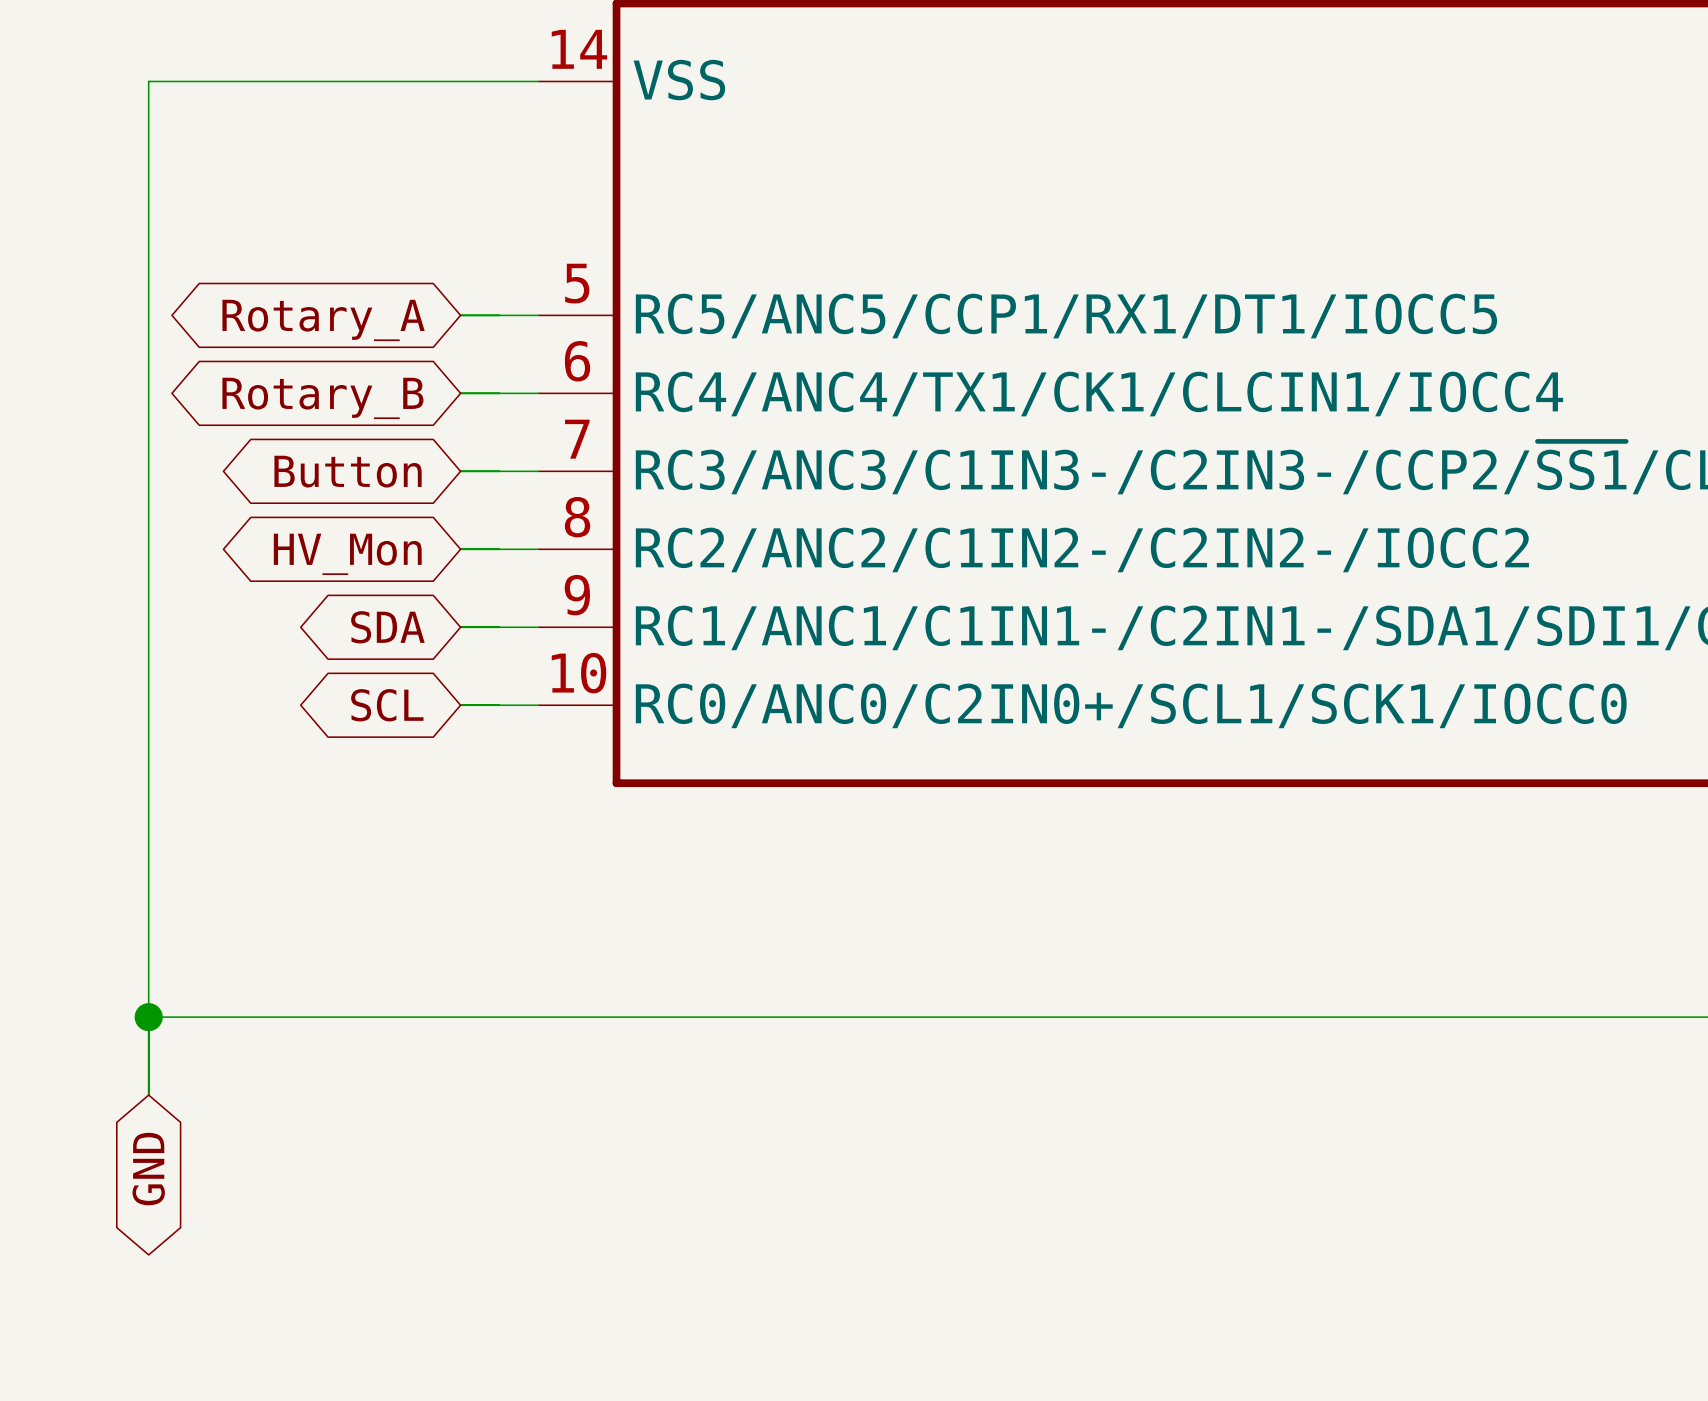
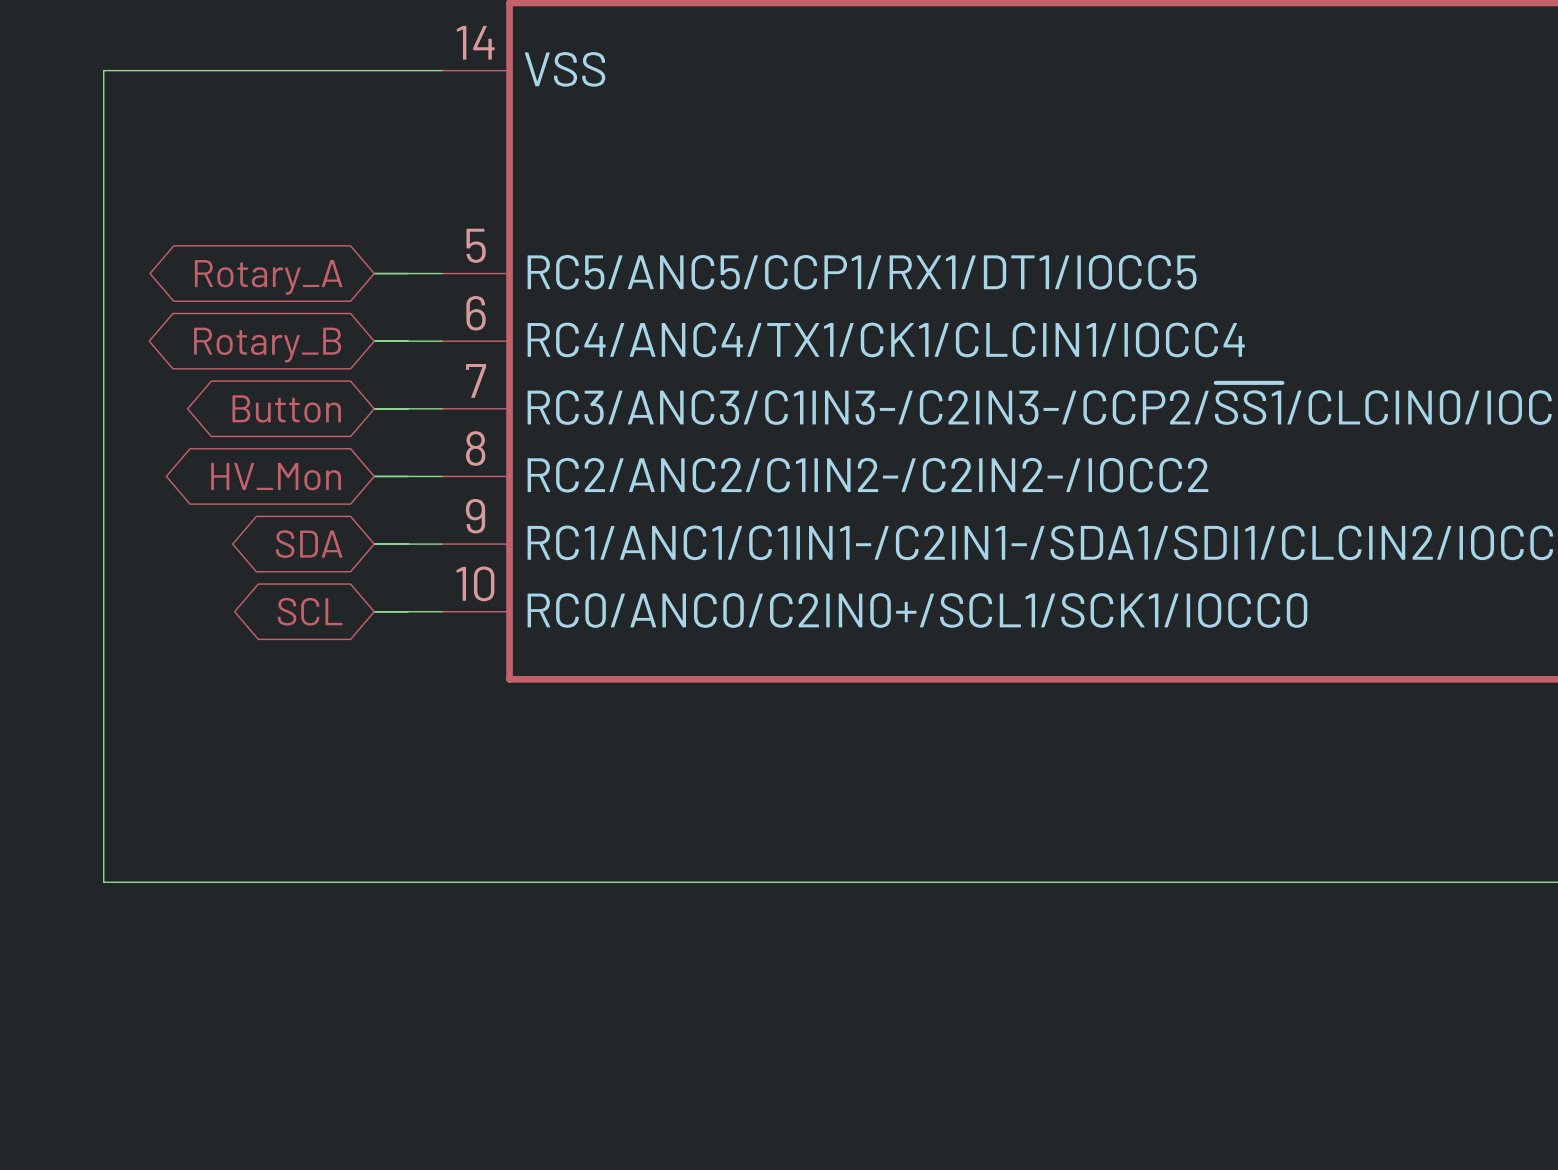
wire: (148, 1017) (148, 1095) -> none
junction: (148, 1017) -> none
global label: GND (148, 1169) -> none

